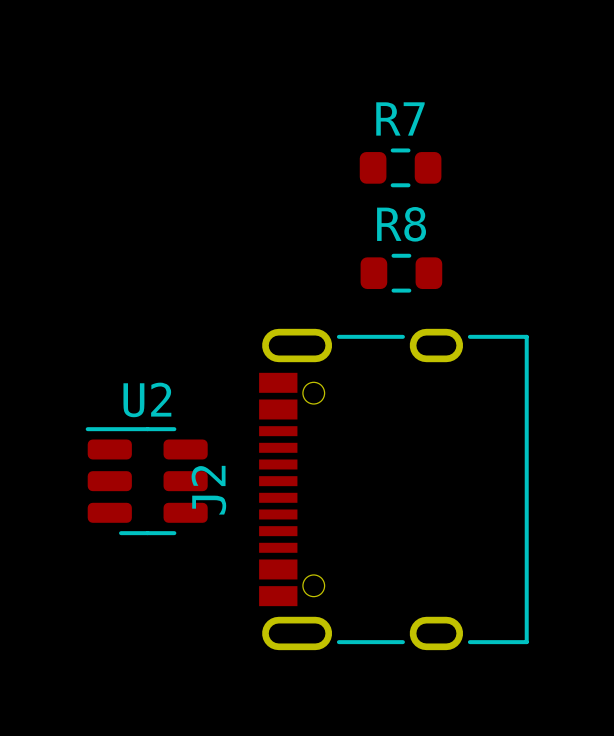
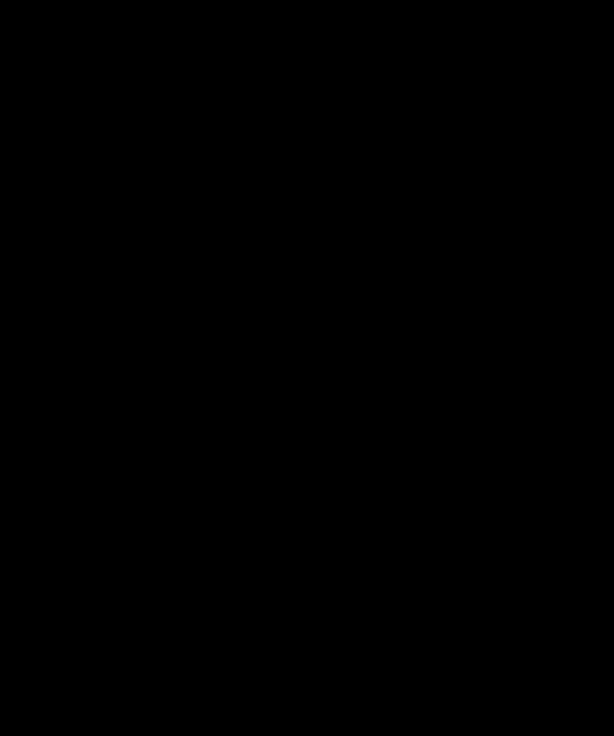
R7: (400, 167) -> none
R8: (401, 273) -> none
U2: (146, 481) -> none
J2: (393, 489) -> none

